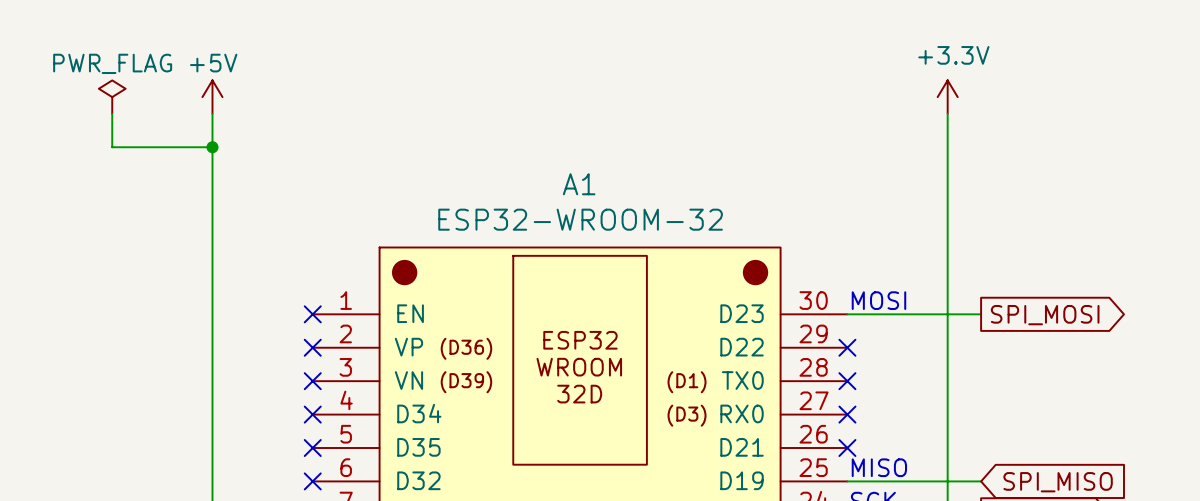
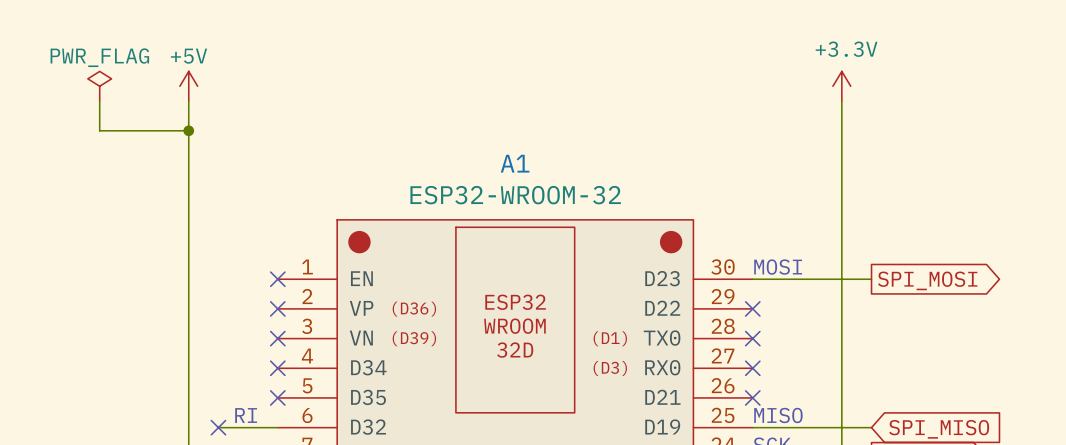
text: none -> RI (246, 415)
wire: none -> (218, 427) (277, 427)
no-connect mark position: (312, 481) -> (218, 427)

